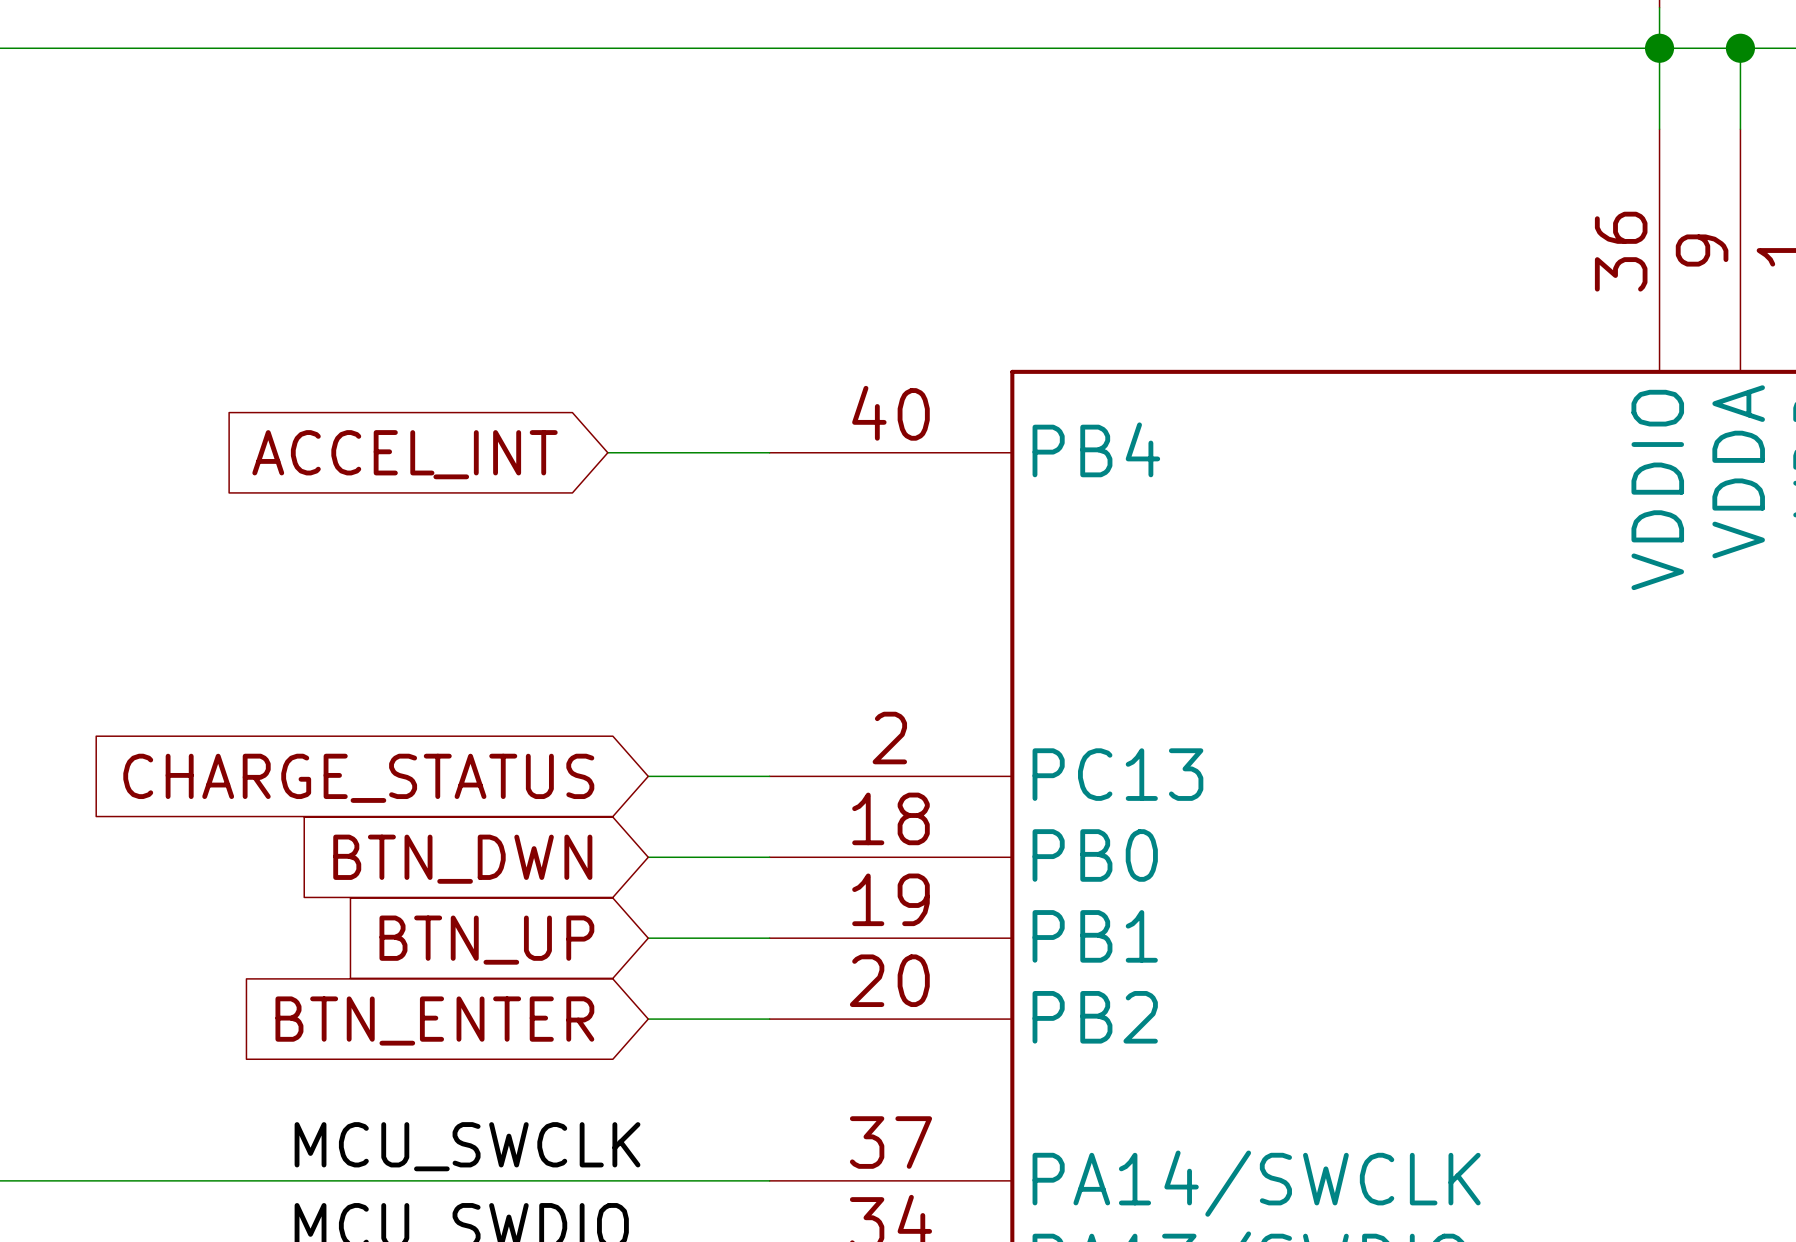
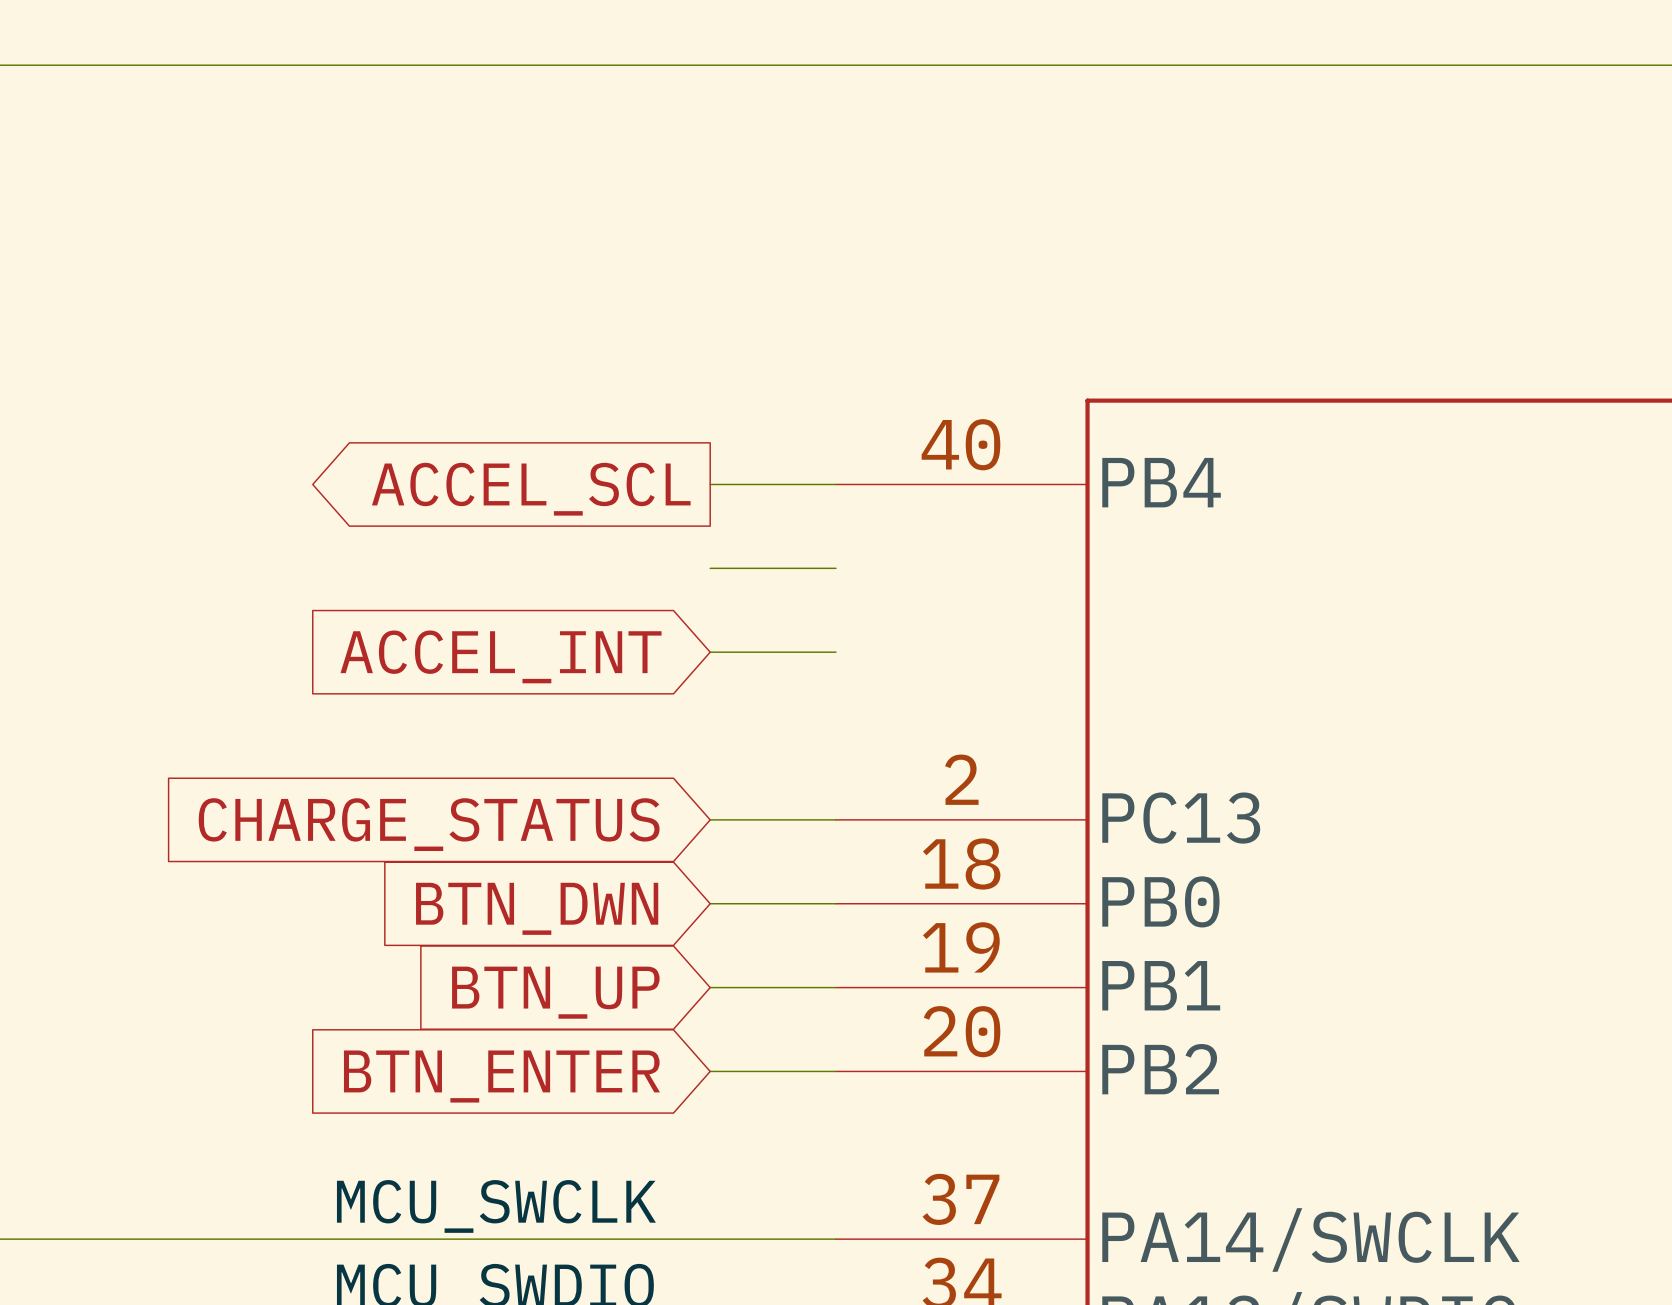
wire: (607, 452) (648, 452) -> none
global label position: ACCEL_INT (405, 454) -> ACCEL_INT (501, 656)
global label: none -> ACCEL_SCL (531, 489)
wire: none -> (710, 568) (835, 568)
wire: none -> (710, 652) (835, 652)

